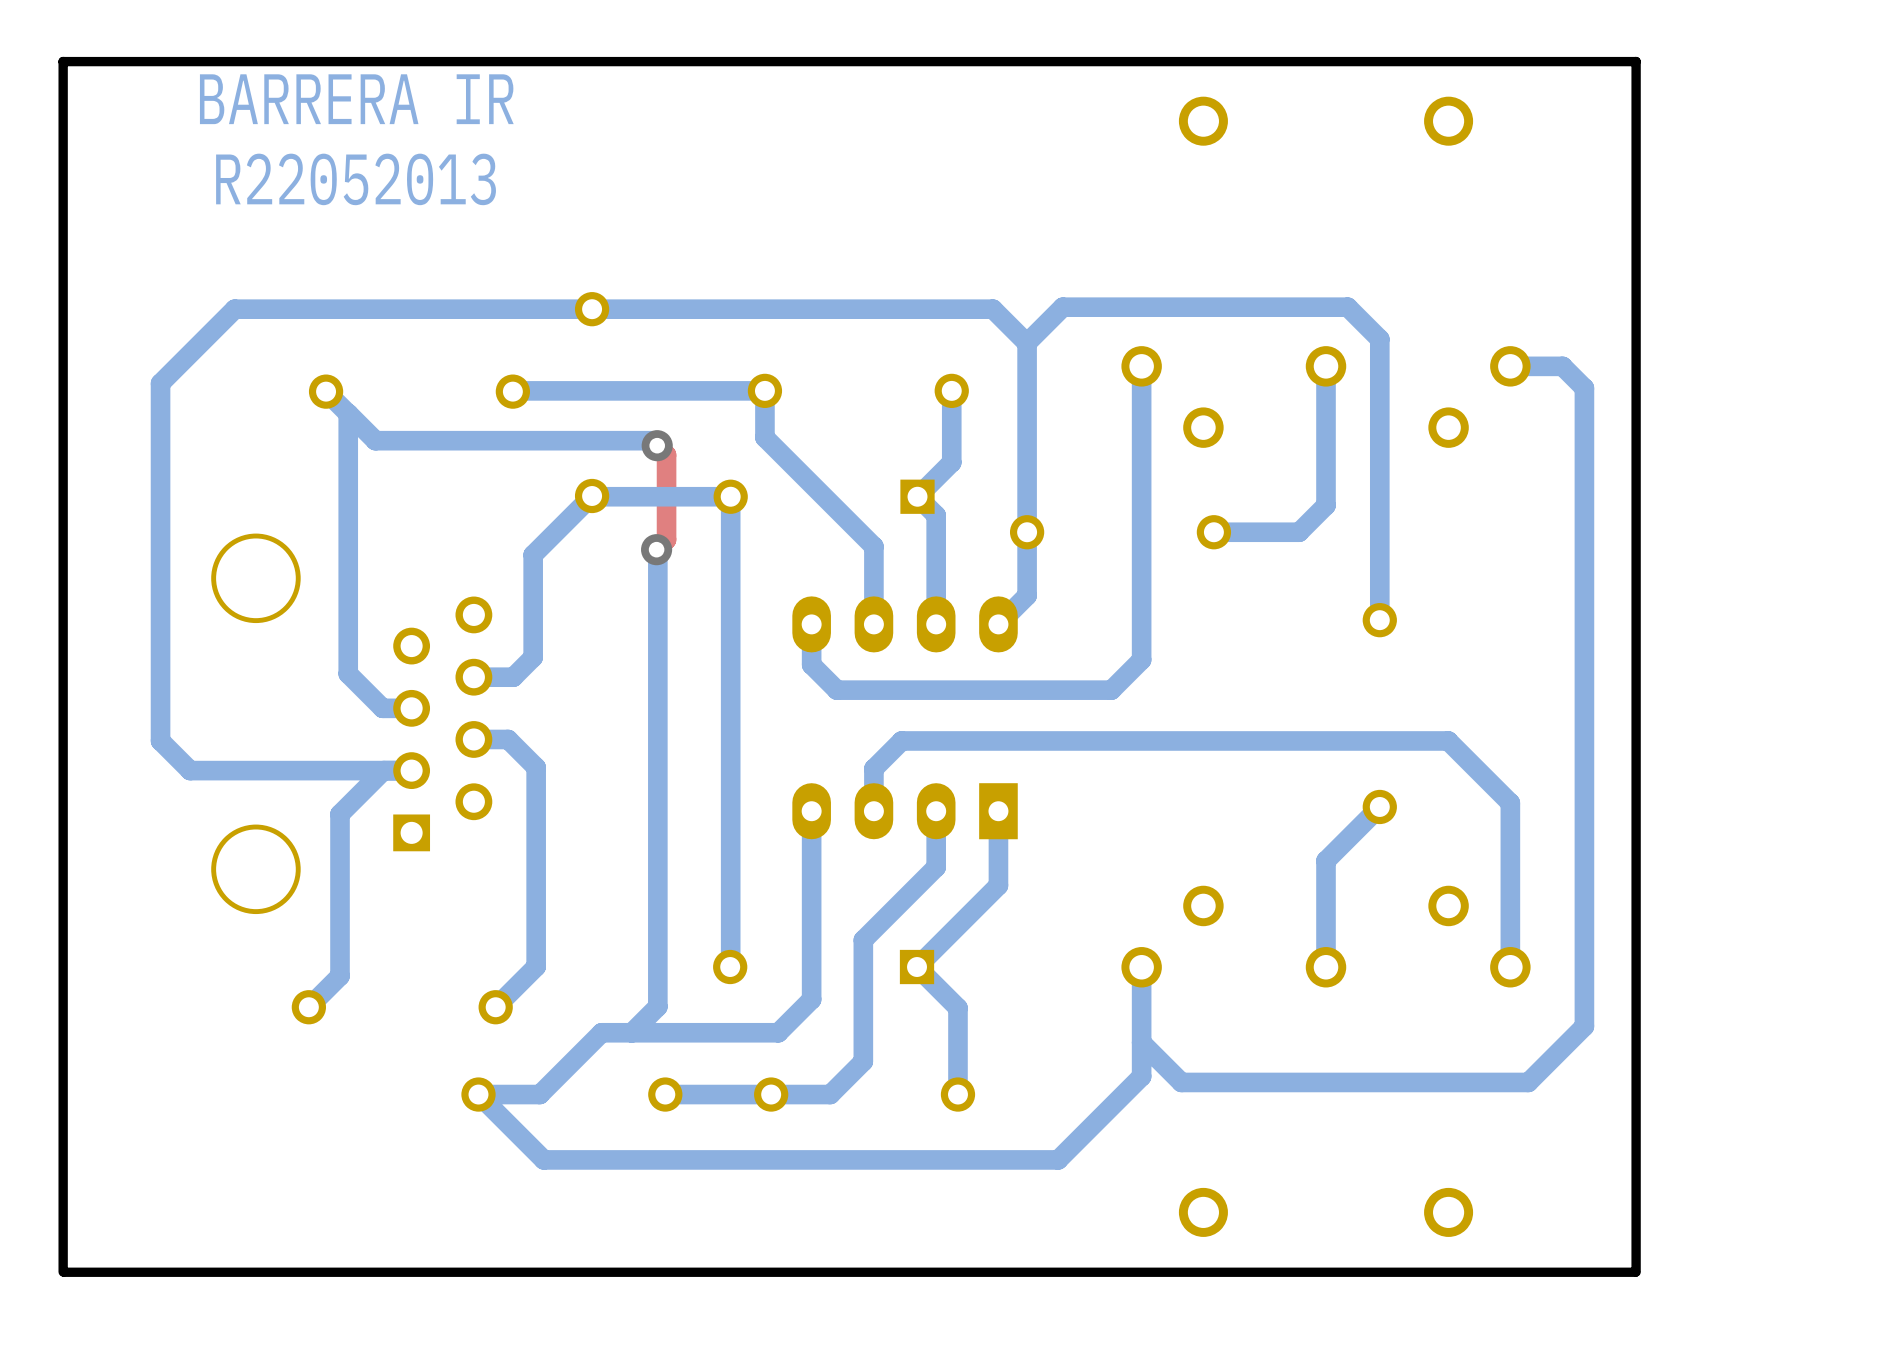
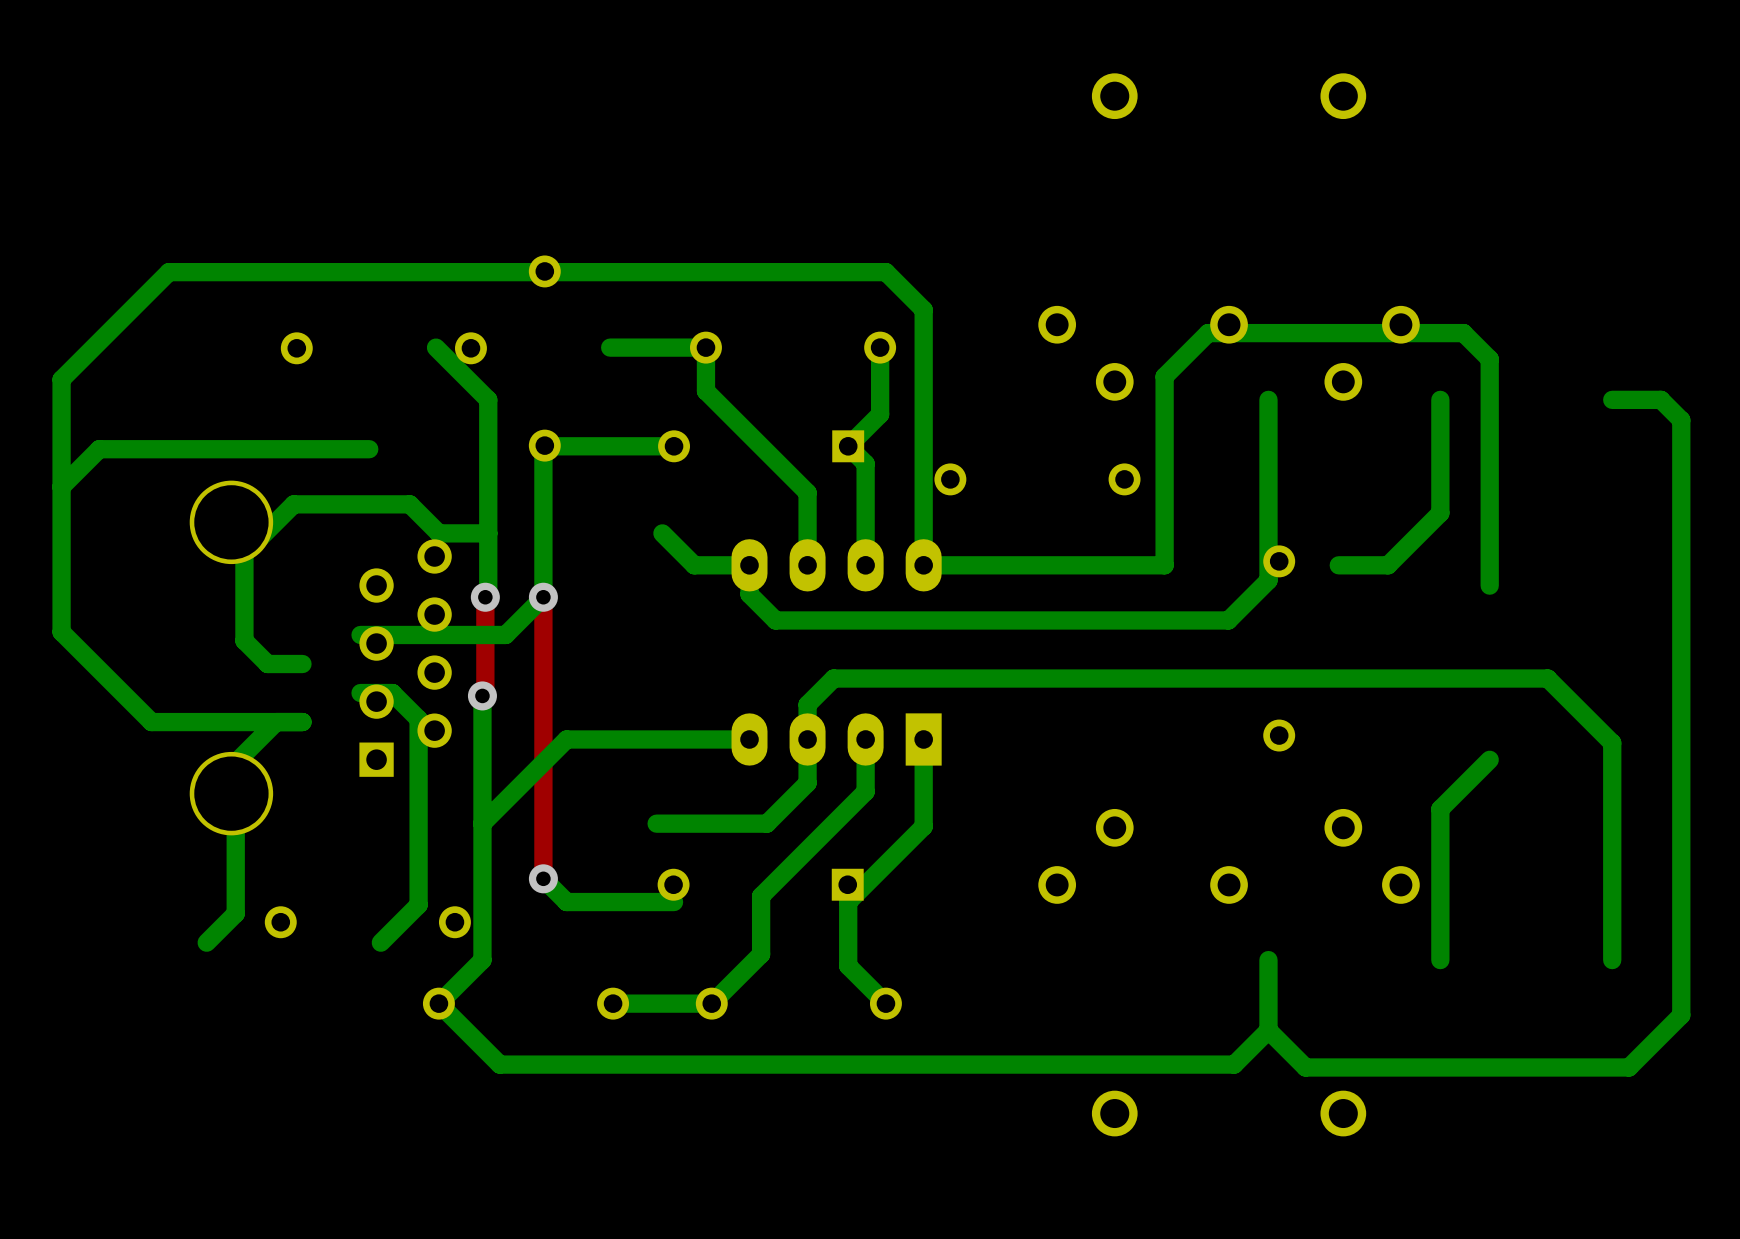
text: BARRERA IR (356, 99) -> none
text: R22052013 (356, 179) -> none
bottom track: (1027, 343) (992, 309) (234, 309) (160, 383) (160, 740) (190, 770) (411, 770) -> none
bottom track: (1141, 366) (1141, 659) (1111, 690) (836, 690) (811, 664) (811, 655) -> (1268, 399) (1268, 580) (1228, 620) (775, 620) (749, 594)
bottom track: (1326, 366) (1326, 505) (1299, 532) (1213, 532) -> none
bottom track: (1510, 366) (1562, 366) (1584, 388) (1584, 1026) (1528, 1082) (1181, 1082) (1141, 1042) -> (1612, 399) (1660, 399) (1681, 420) (1681, 1015) (1629, 1067) (1305, 1067) (1268, 1030)
bottom track: none -> (436, 347) (488, 399) (488, 594) (485, 597)
bottom track: (662, 390) (512, 391) -> none
bottom track: (326, 391) (348, 413) (348, 673) (382, 708) (411, 708) -> none
bottom track: (348, 413) (375, 440) (652, 440) (657, 445) -> none
top track: (657, 445) (666, 455) (666, 539) (656, 549) -> none
via: (657, 445) -> none
bottom track: none -> (1440, 399) (1440, 513) (1388, 565) (1338, 565)
bottom track: (593, 496) (592, 495) (533, 554) (533, 657) (513, 677) (473, 677) -> (546, 446) (543, 449) (543, 597) (505, 634) (360, 634)
bottom track: (730, 496) (730, 967) -> none
bottom track: none -> (369, 449) (99, 449) (61, 486)
bottom track: (656, 549) (657, 1006) (631, 1032) -> none
via: (656, 549) -> none
bottom track: none -> (488, 533) (438, 533) (409, 504) (293, 504) (244, 553) (244, 640) (267, 664) (302, 664)
bottom track: none -> (662, 533) (694, 565) (749, 565)
bottom track: (1379, 620) (1379, 339) (1347, 307) (1062, 307) (1027, 342) (1027, 595) (998, 624) -> none
bottom track: none -> (1489, 585) (1489, 359) (1463, 333) (1208, 333) (1164, 376) (1164, 565) (923, 565) (923, 309) (885, 272) (168, 272) (61, 379) (61, 632) (151, 722) (302, 722)
top track: none -> (485, 597) (485, 693) (482, 695)
via: none -> (485, 597)
top track: none -> (543, 597) (543, 878)
via: none -> (543, 597)
bottom track: (473, 739) (508, 739) (536, 767) (536, 966) (495, 1007) -> (360, 693) (392, 693) (418, 719) (418, 904) (380, 942)
bottom track: none -> (482, 695) (482, 960) (438, 1003)
via: none -> (482, 695)
bottom track: (383, 770) (340, 814) (340, 976) (308, 1007) -> (276, 722) (235, 762) (235, 913) (206, 942)
bottom track: (873, 773) (873, 768) (901, 740) (1448, 740) (1510, 803) (1510, 967) -> (807, 704) (833, 678) (1547, 678) (1612, 743) (1612, 960)
bottom track: (1379, 806) (1326, 860) (1326, 967) -> none
bottom track: (811, 811) (811, 999) (778, 1032) (601, 1032) (539, 1094) (478, 1094) -> (749, 739) (566, 739) (482, 823)
bottom track: none -> (807, 739) (807, 783) (766, 823) (656, 823)
bottom track: none -> (1489, 759) (1440, 809) (1440, 960)
bottom track: (998, 885) (917, 967) (957, 1007) (957, 1094) -> (923, 808) (923, 826) (848, 902) (848, 965) (885, 1003)
bottom track: (863, 940) (863, 1061) (830, 1094) (771, 1094) -> (797, 859) (761, 896) (761, 954) (711, 1003)
bottom track: none -> (543, 878) (566, 902) (674, 902)
via: none -> (543, 878)
bottom track: (1141, 967) (1141, 1076) (1058, 1159) -> (1268, 1030) (1234, 1064) (979, 1064)
bottom track: none -> (1268, 960) (1268, 1030)
board edge: (1635, 1272) (64, 1272) -> none
board edge: (1636, 1272) (1636, 61) (63, 61) (63, 1272) -> none

